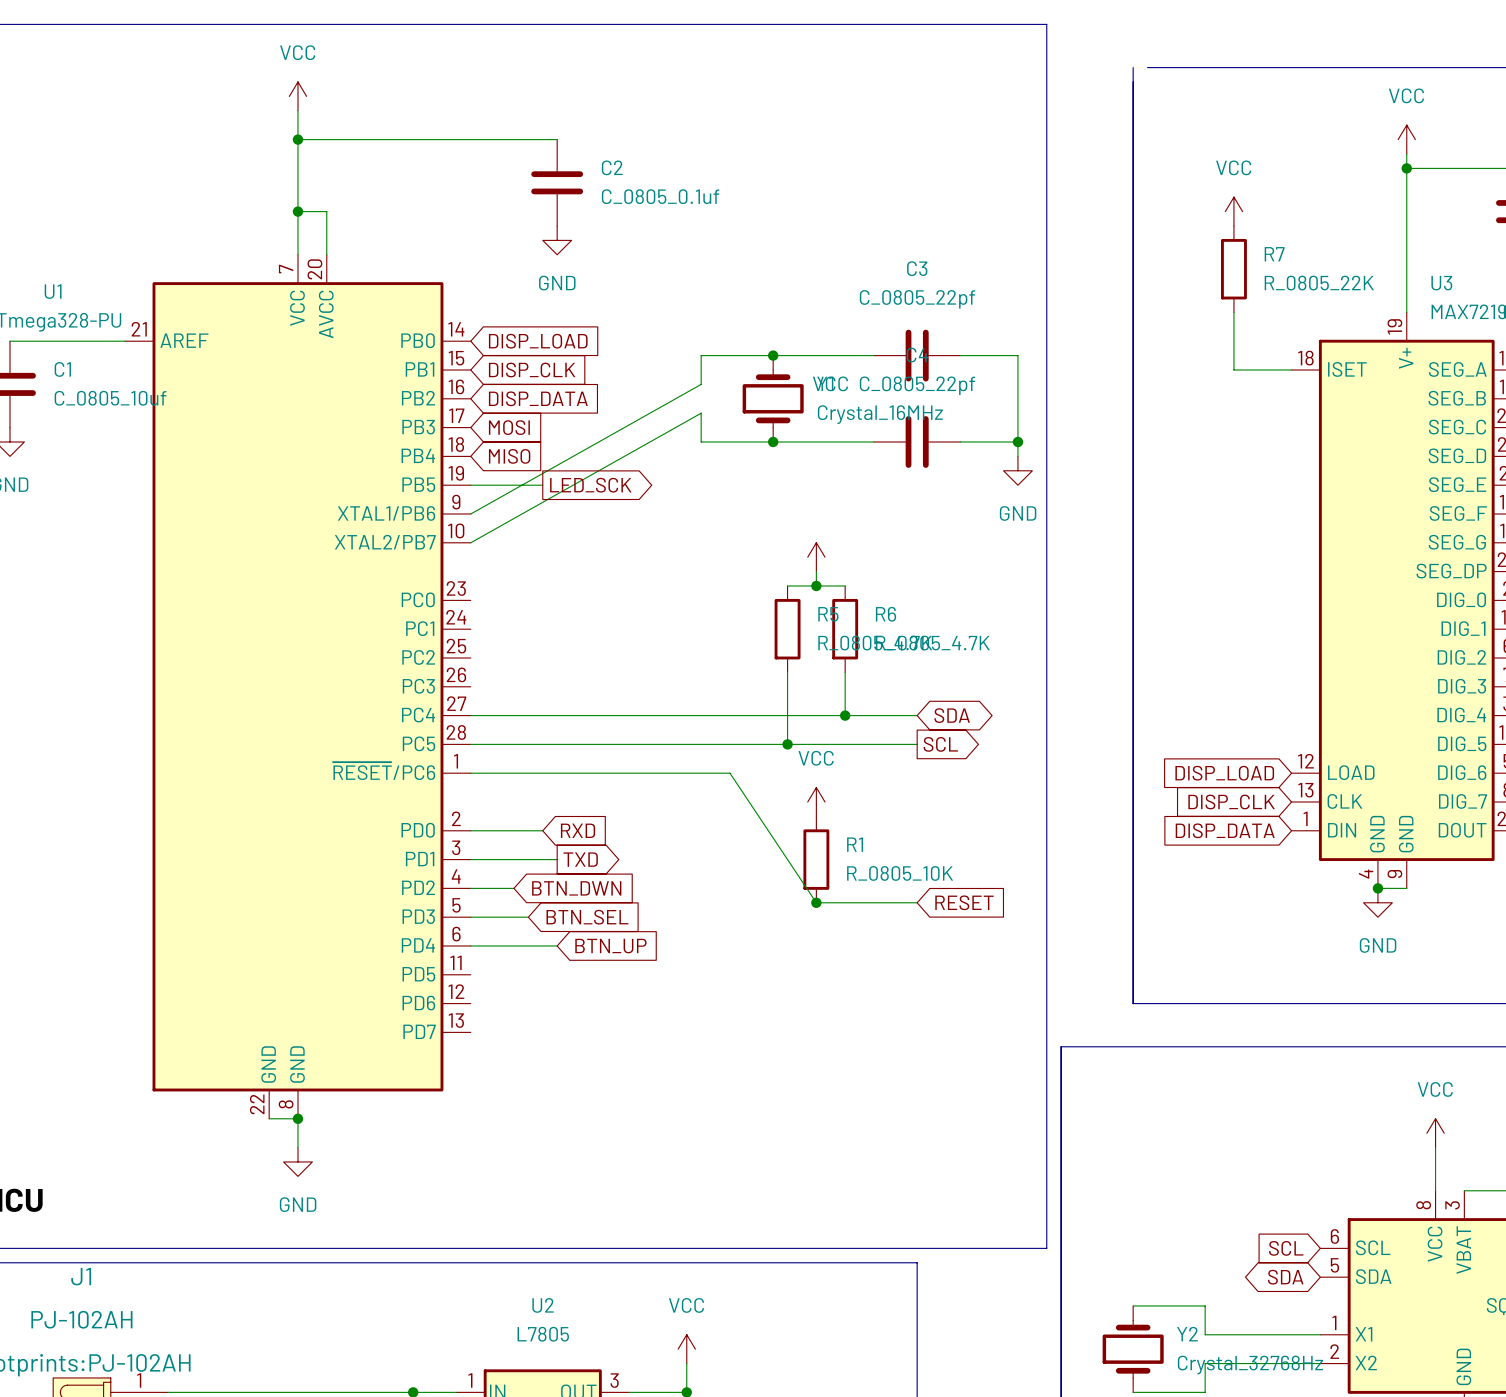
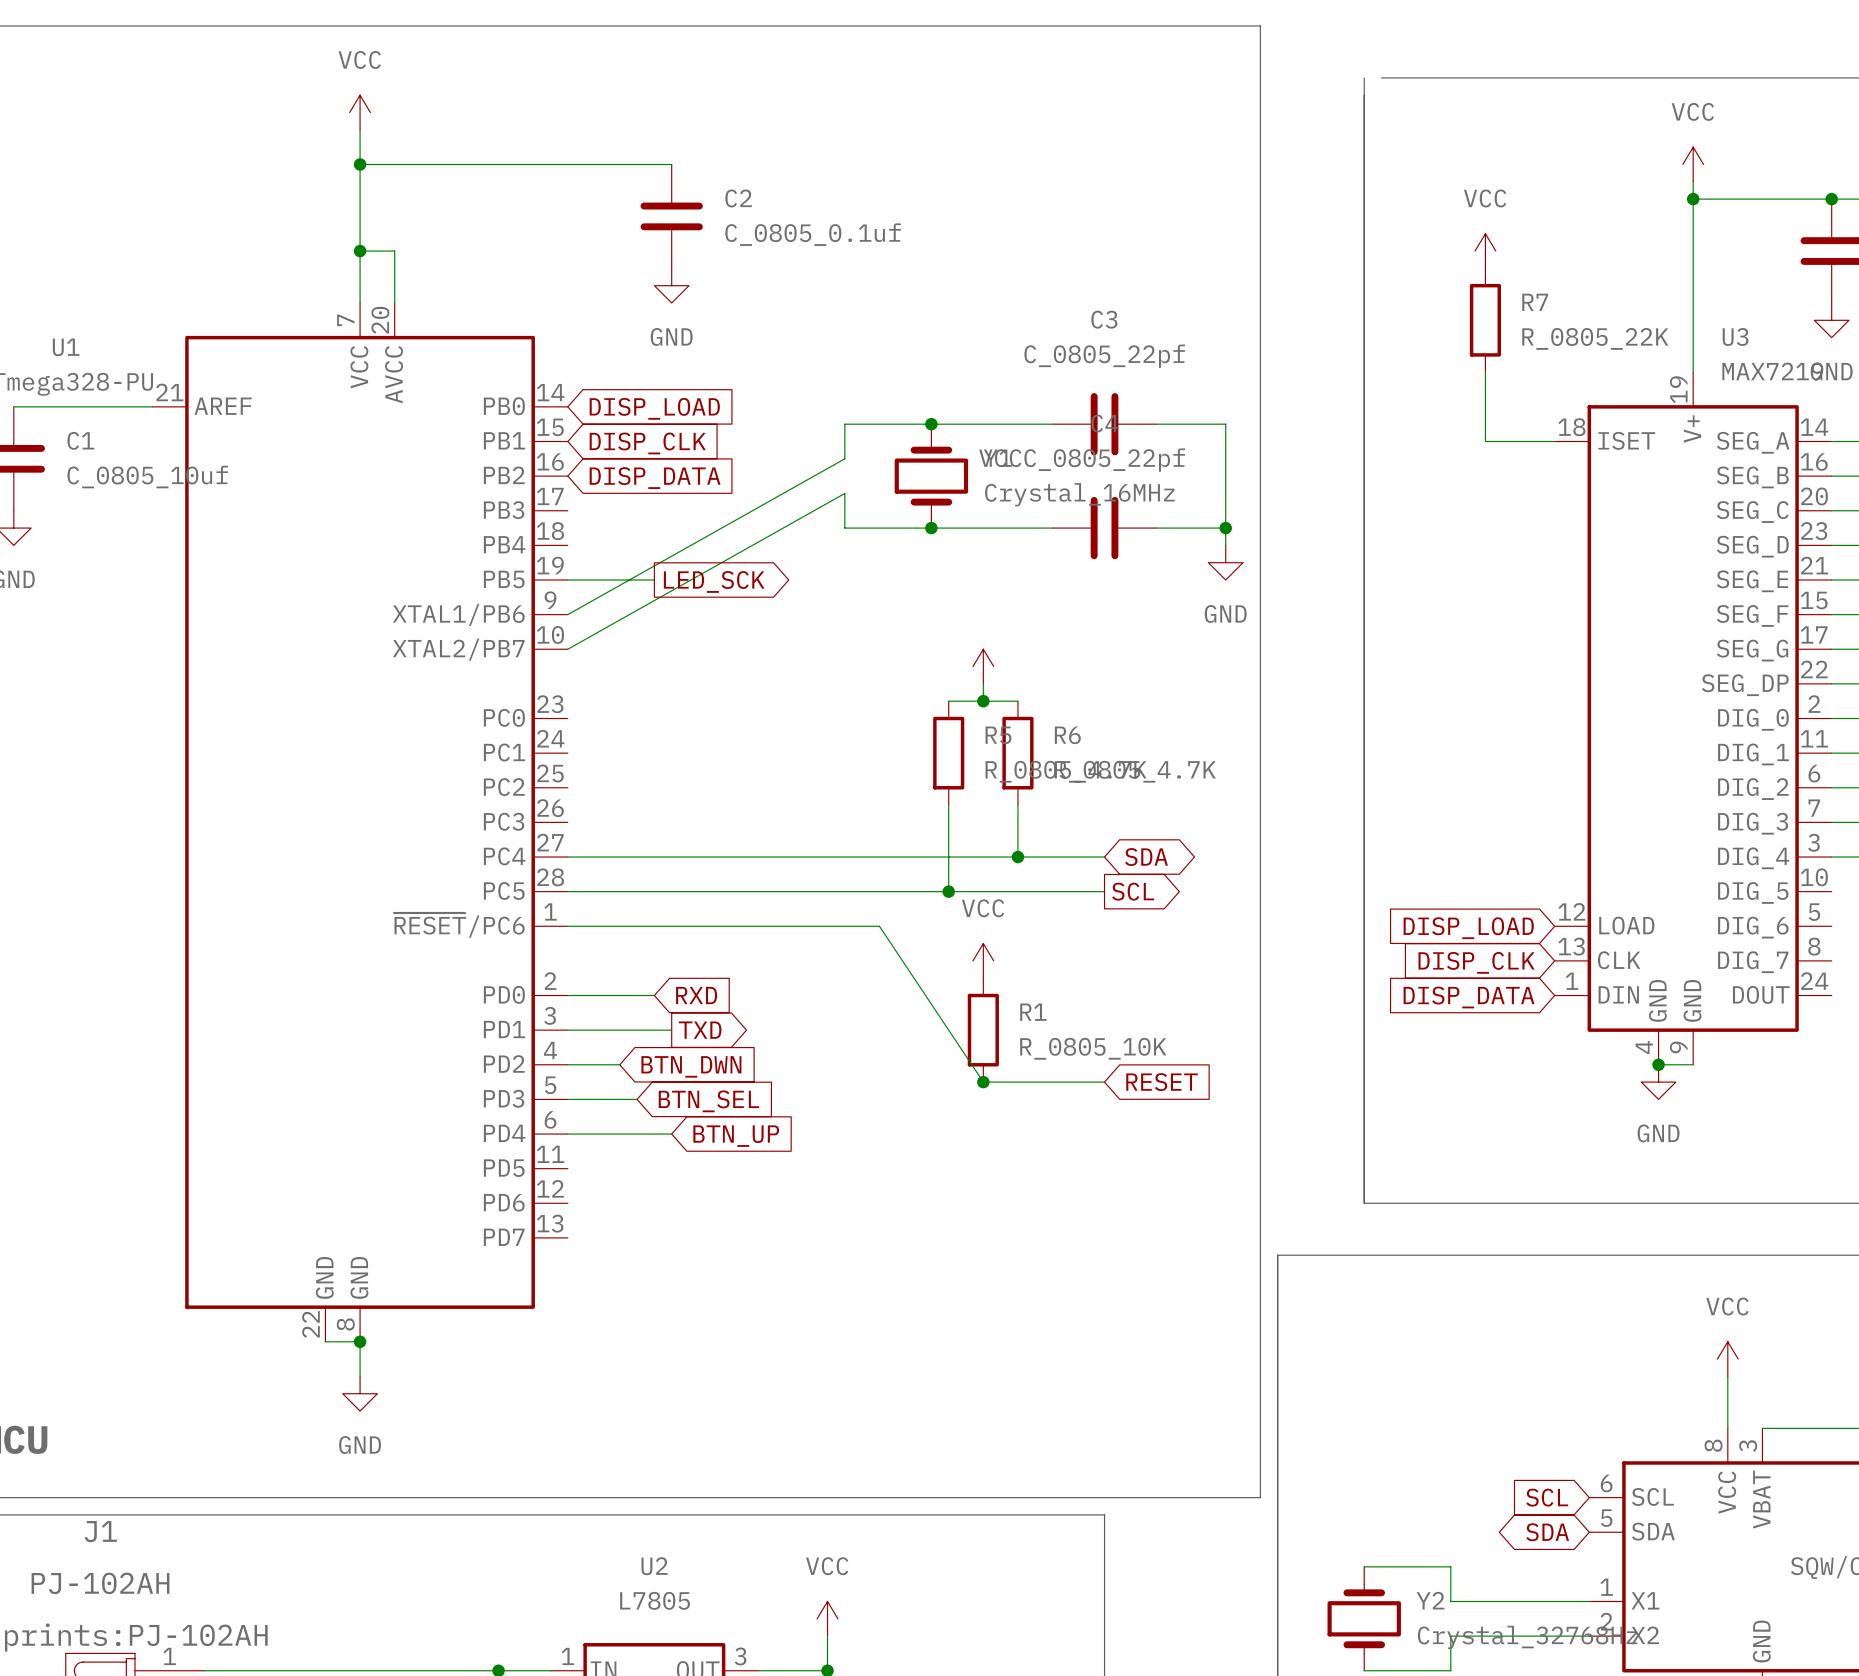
global label: MOSI (509, 427) -> none
global label: MISO (509, 456) -> none

